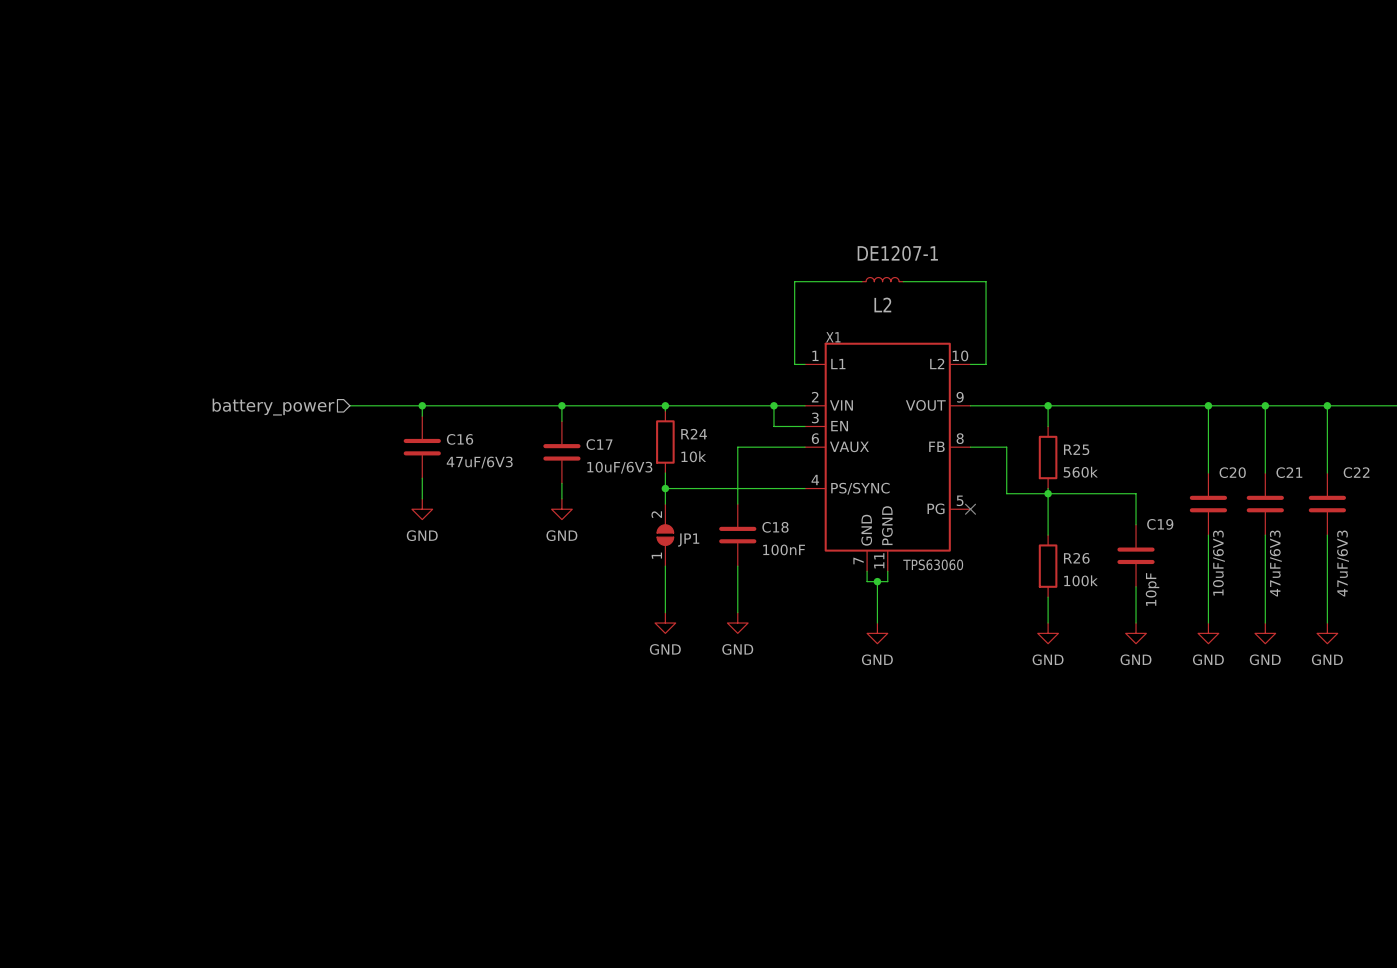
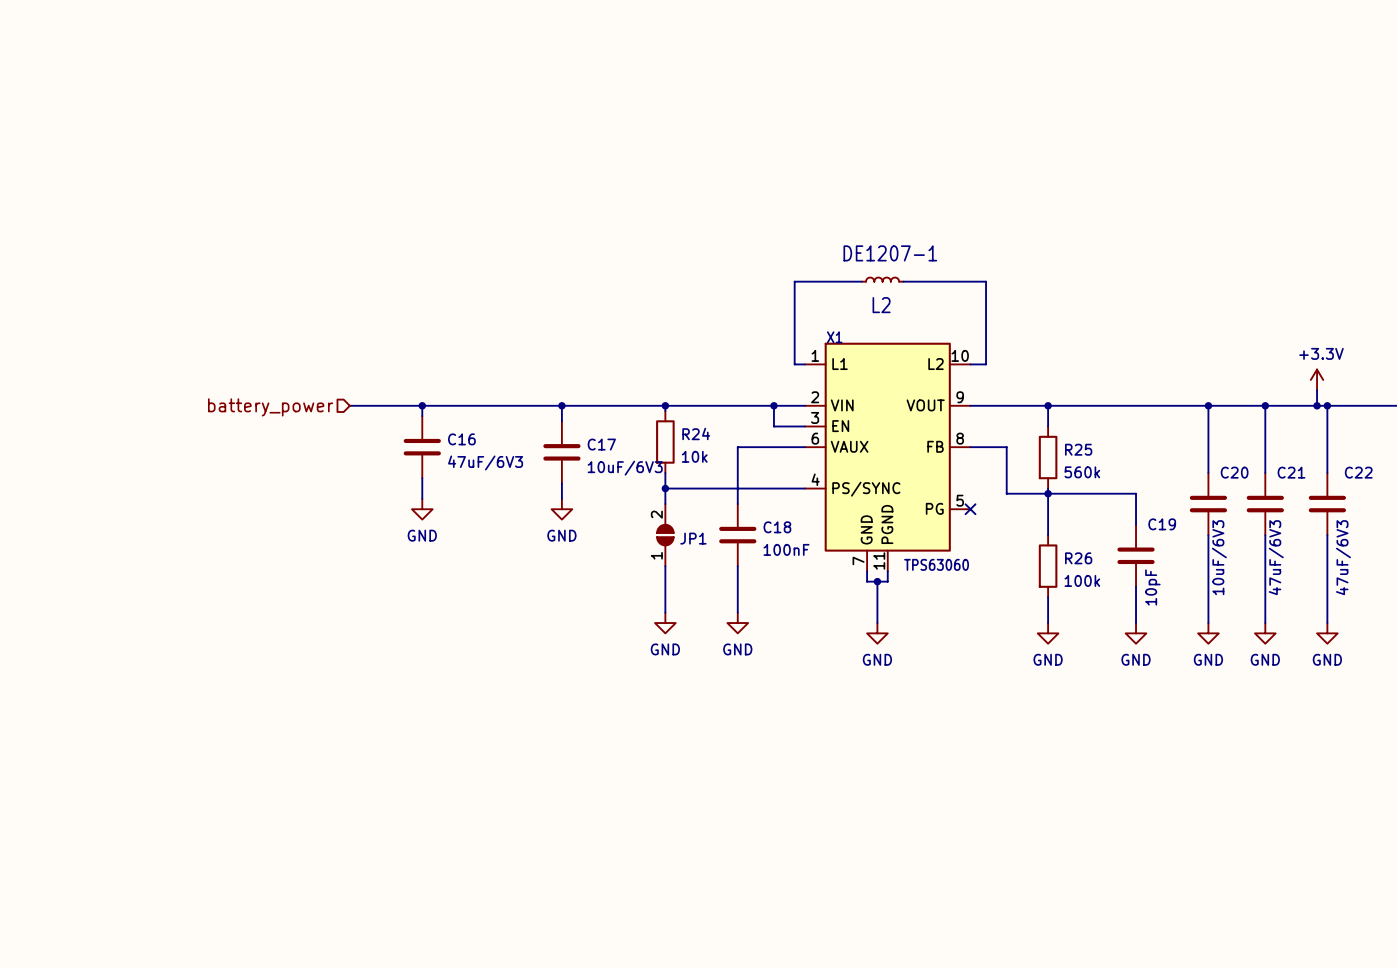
power symbol: none -> +3.3V (1317, 379)
wire: none -> (1317, 390) (1317, 405)
junction: none -> (1317, 405)

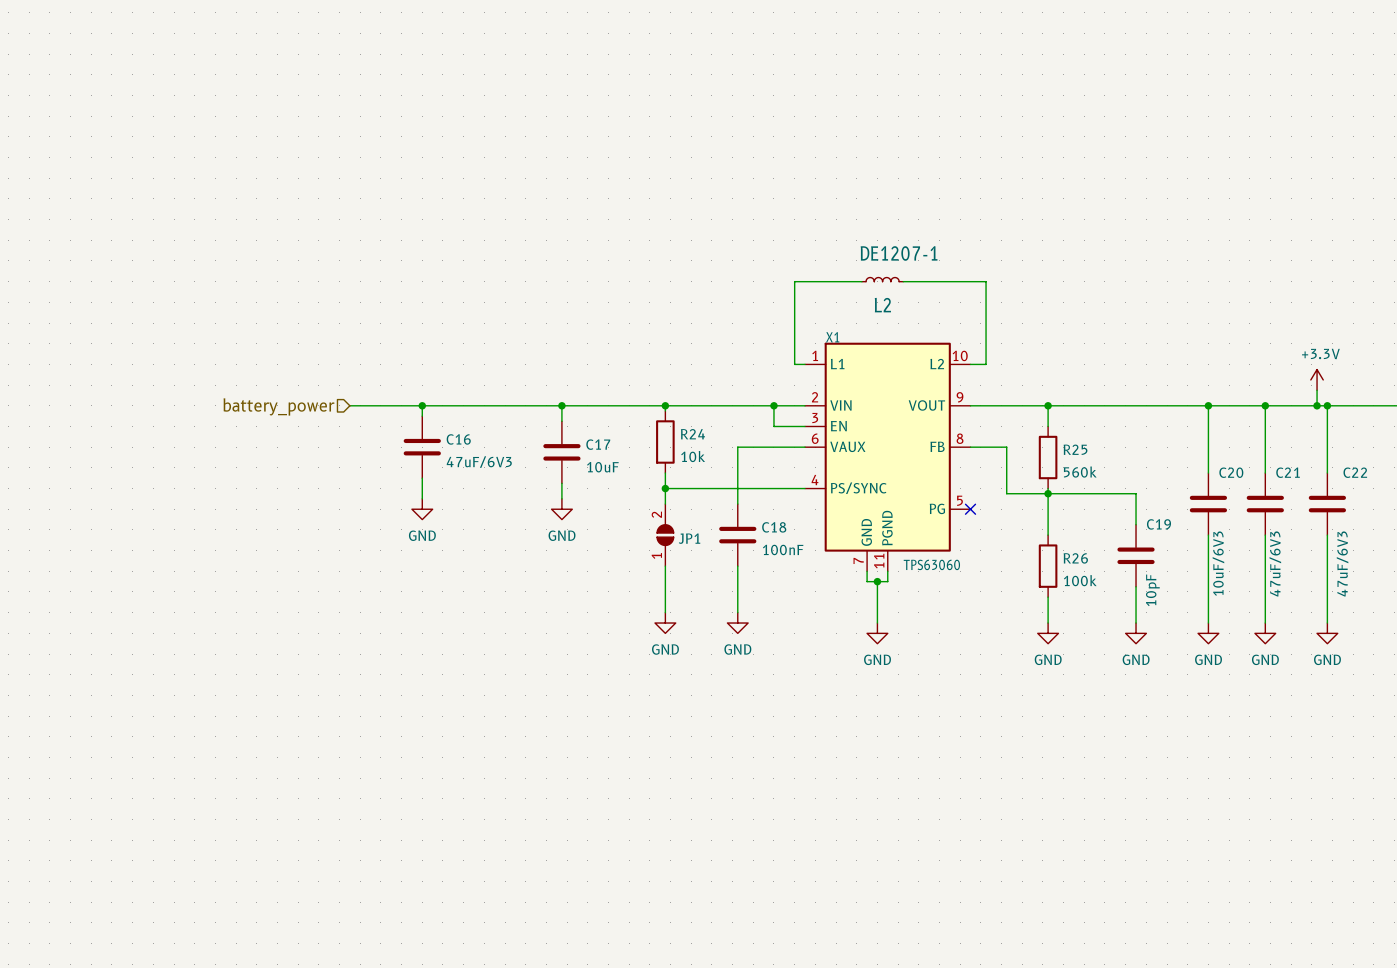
C17 value: 10uF/6V3 (625, 468) -> 10uF (602, 467)

